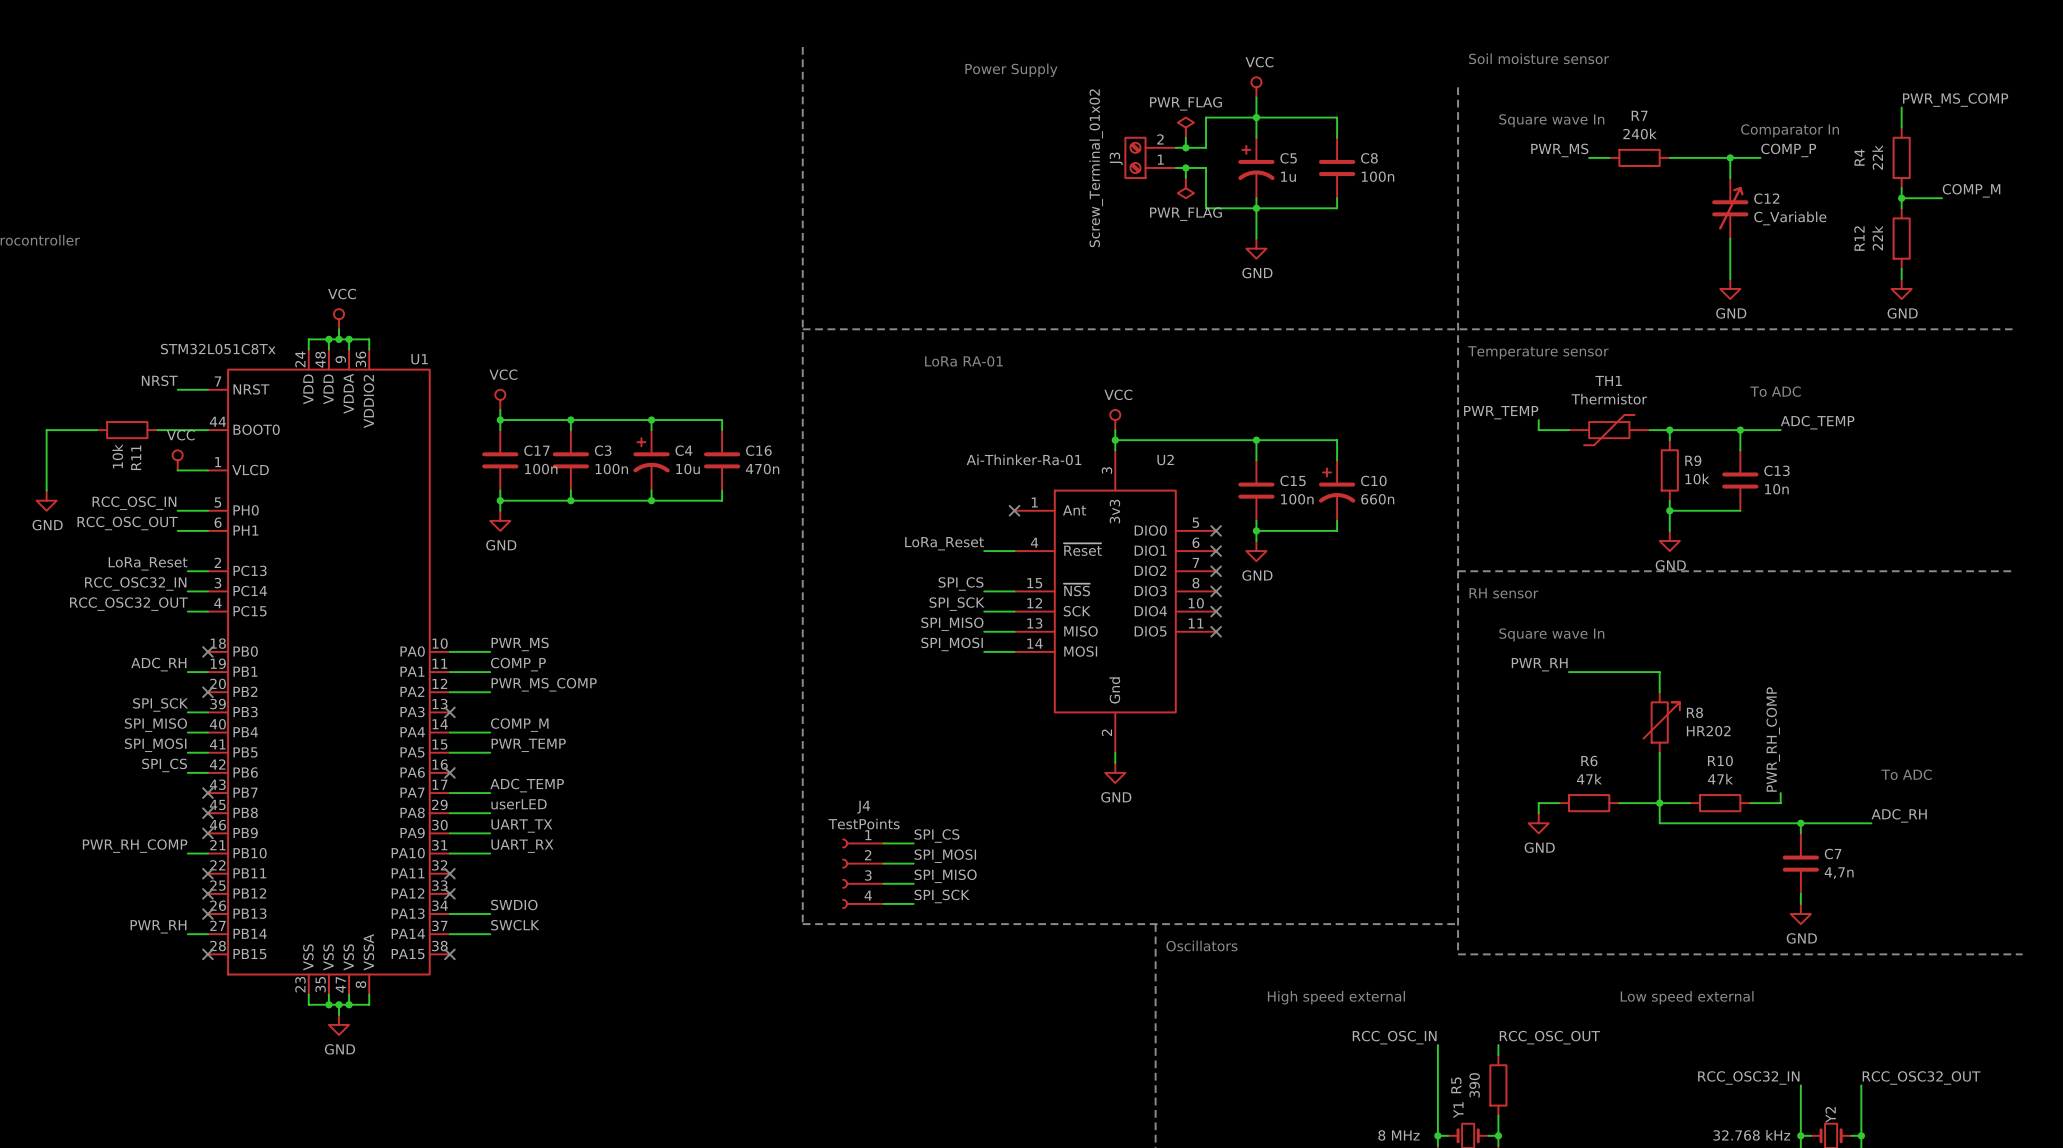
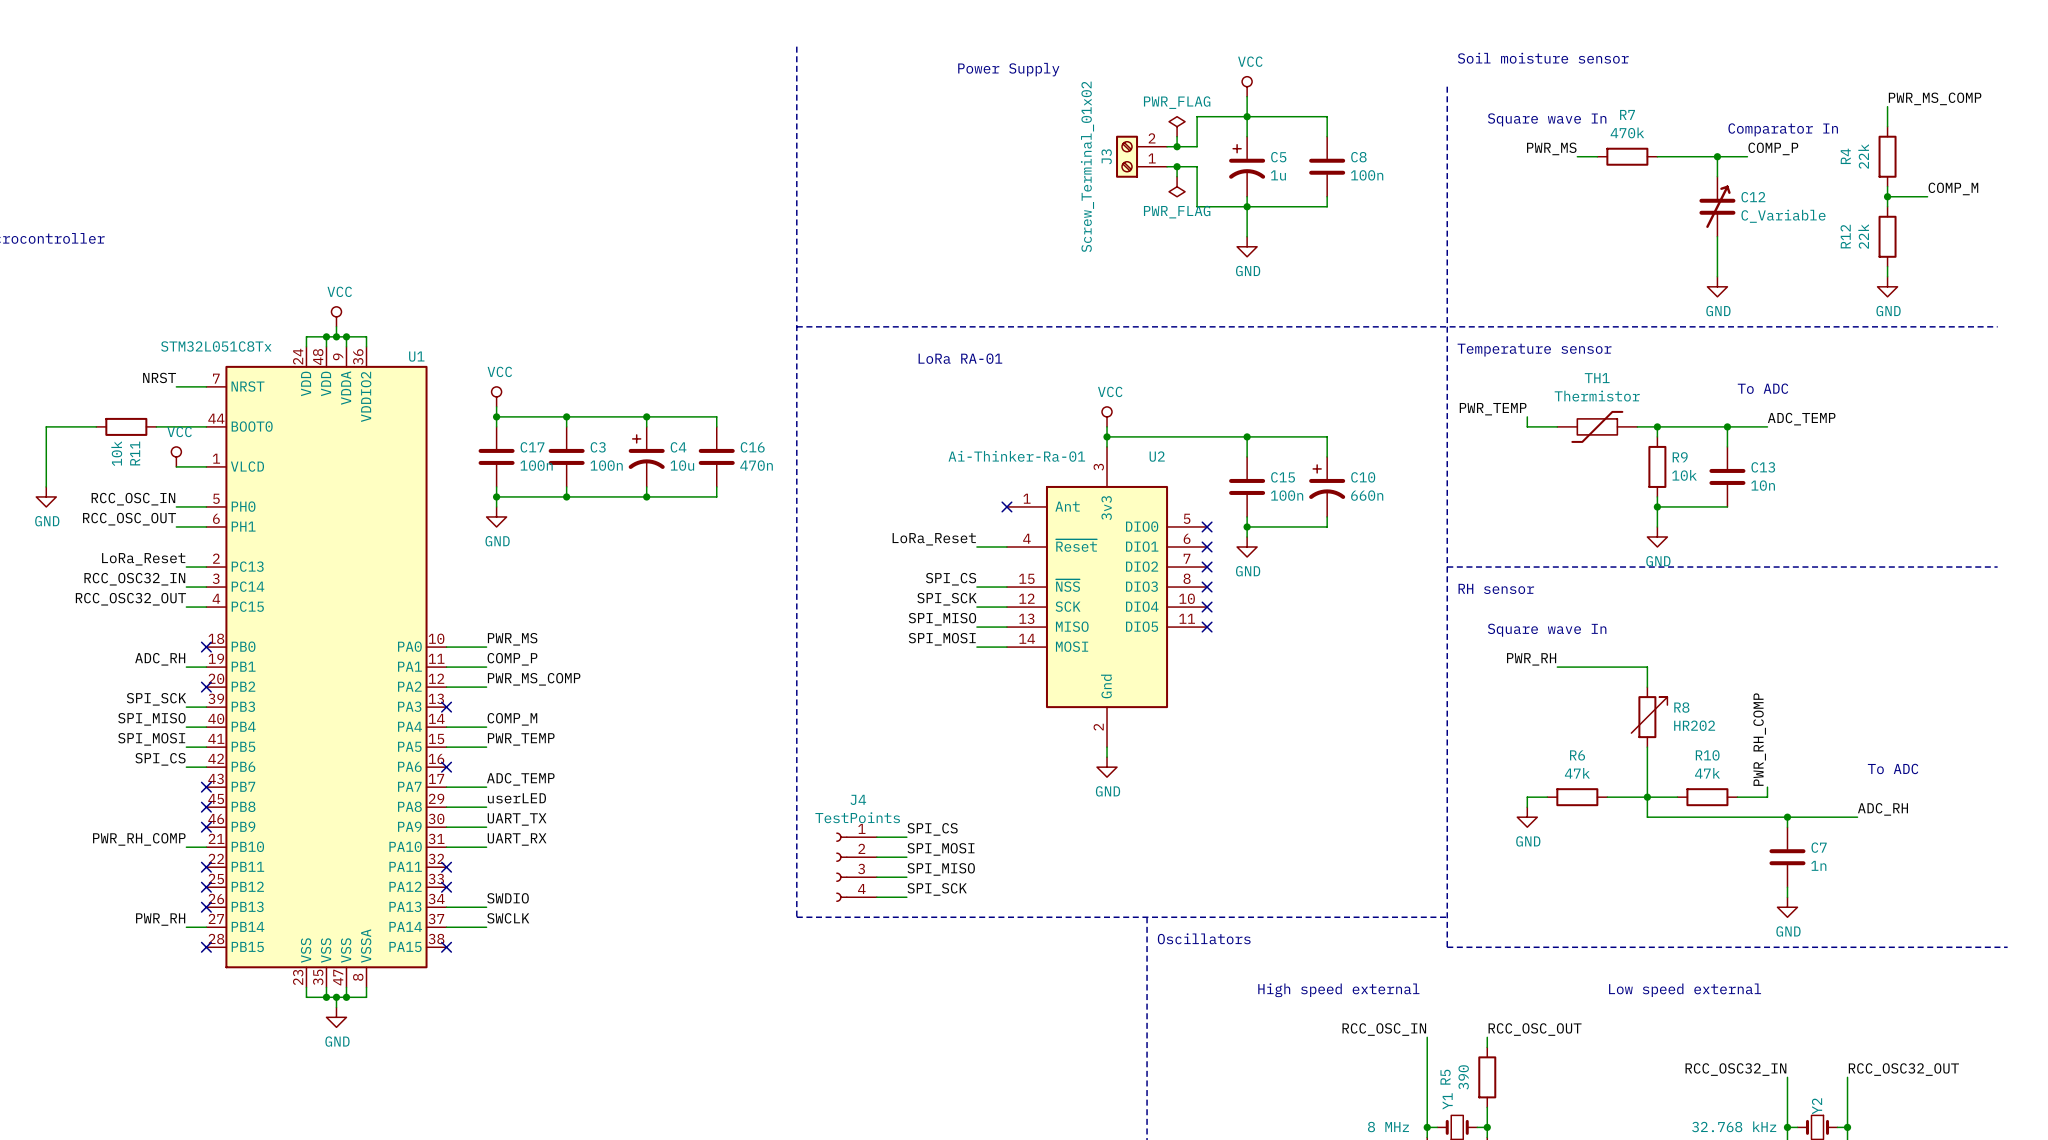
R7 value: 240k (1640, 134) -> 470k (1627, 132)
C7 value: 4,7n (1839, 873) -> 1n (1818, 865)

